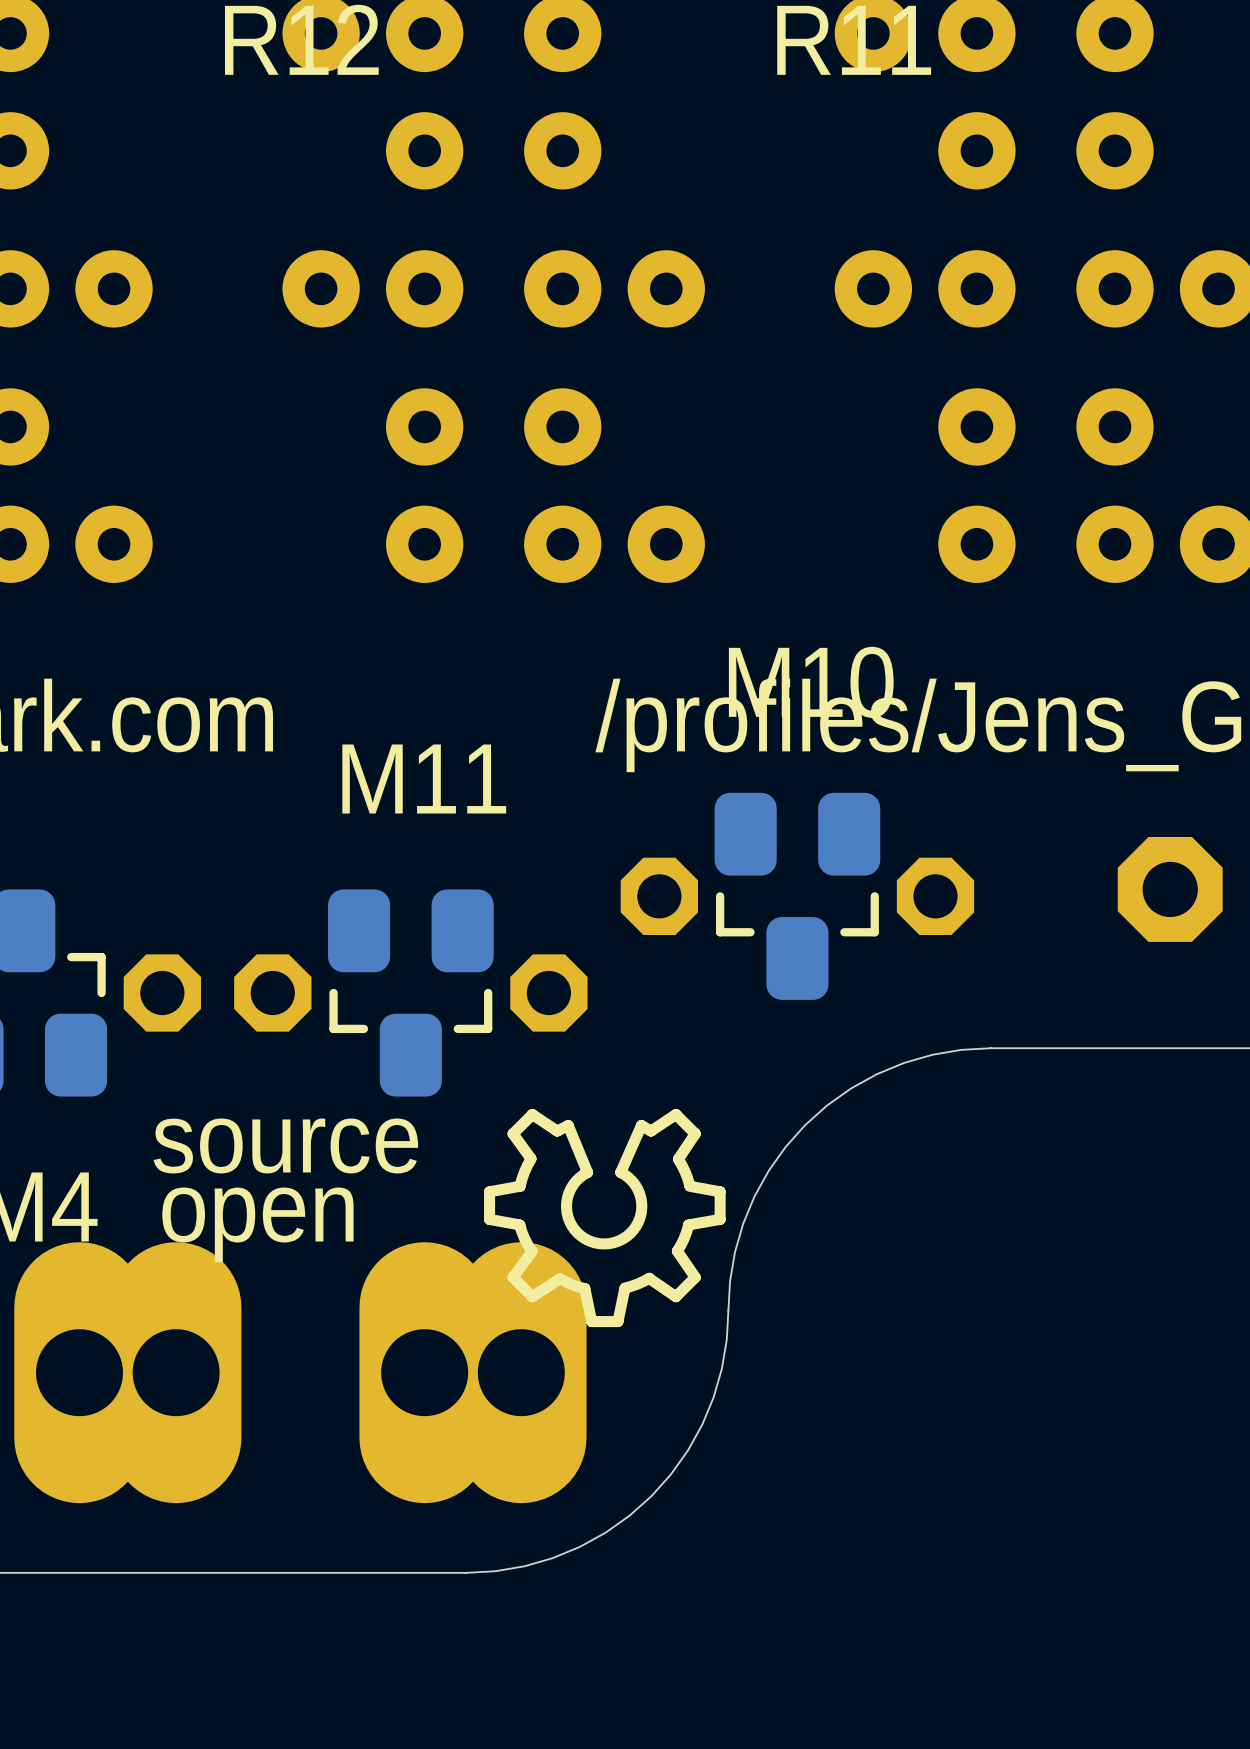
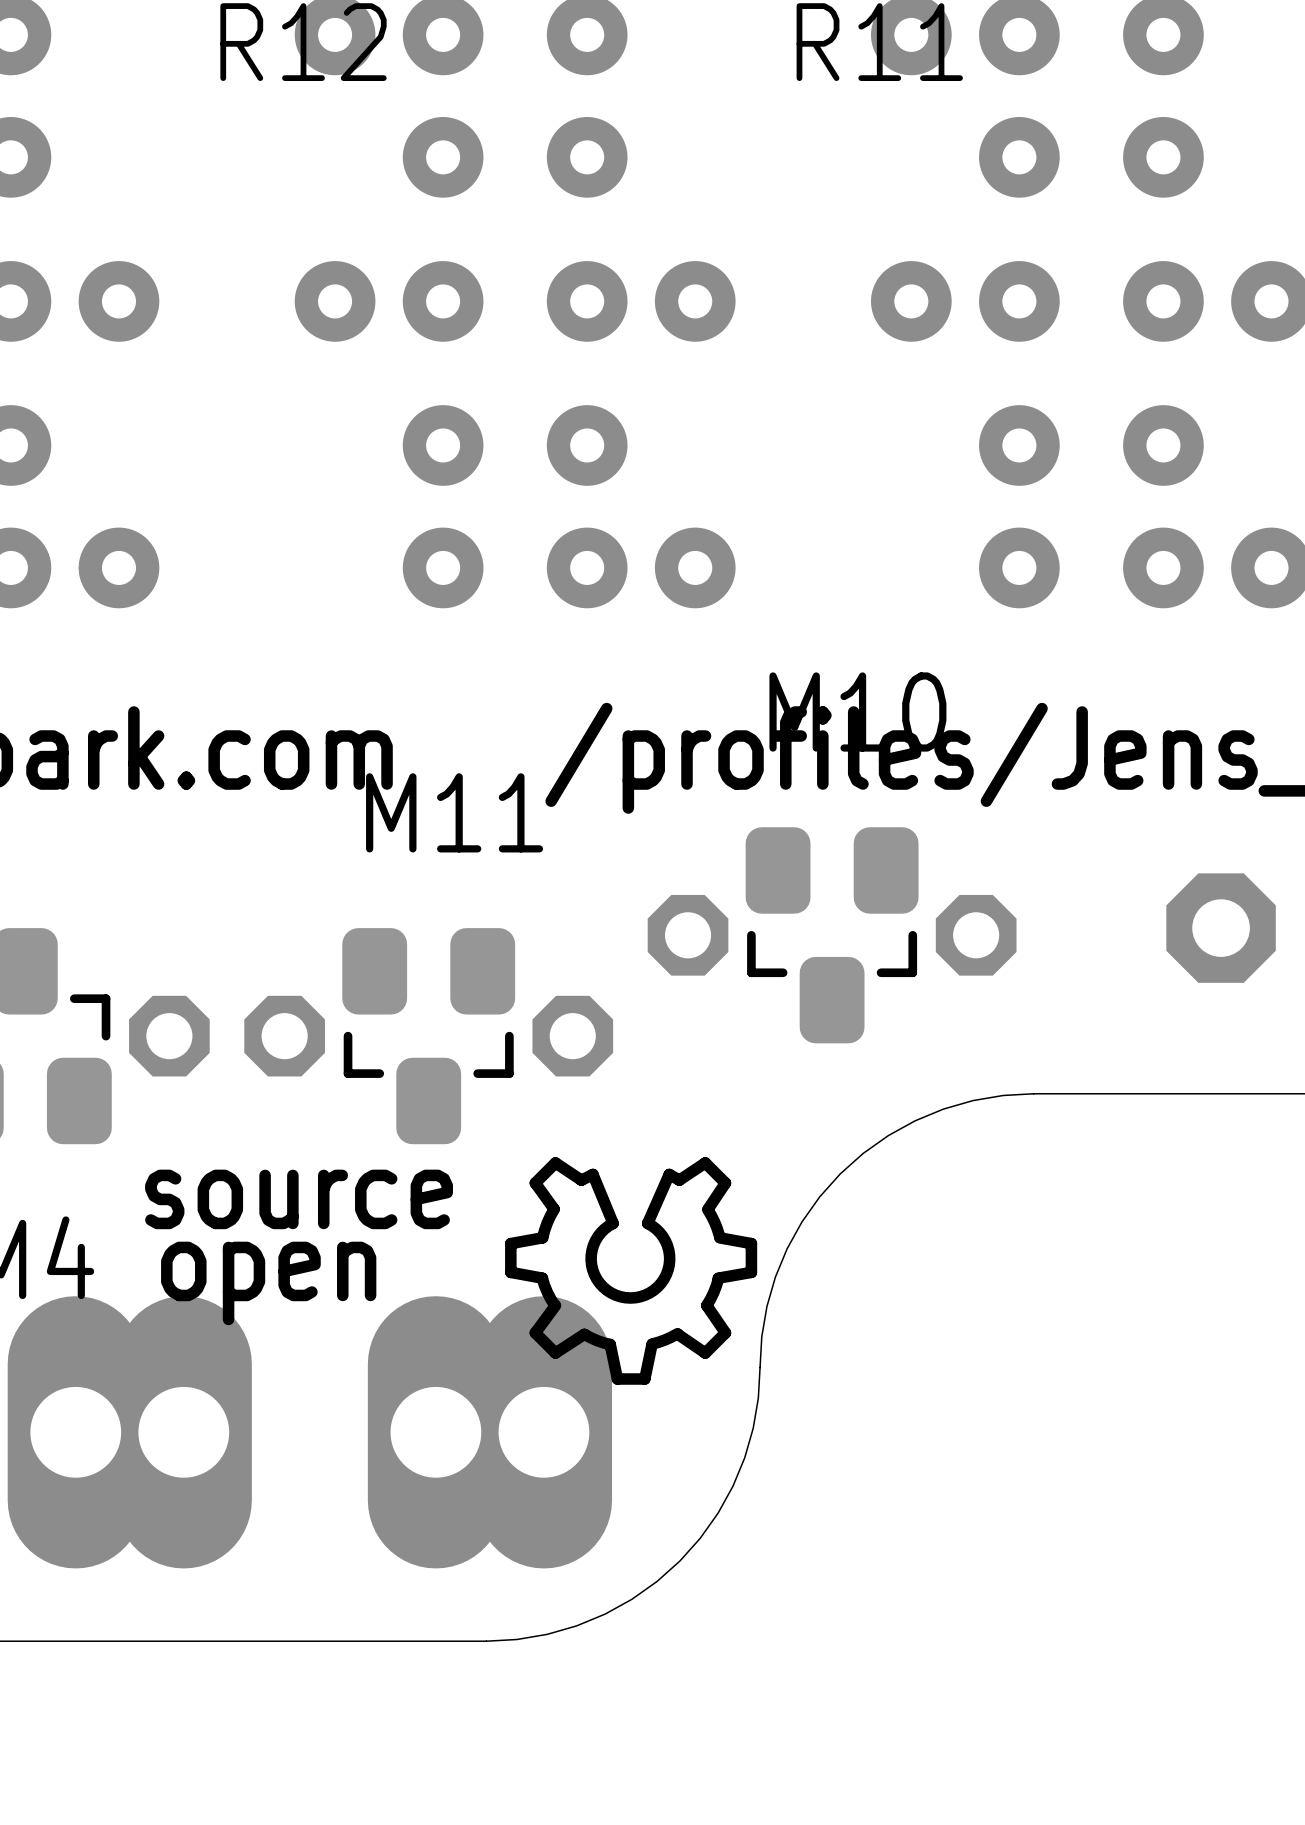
part footprint: [14, 1242, 587, 1504] -> [7, 1296, 613, 1569]

